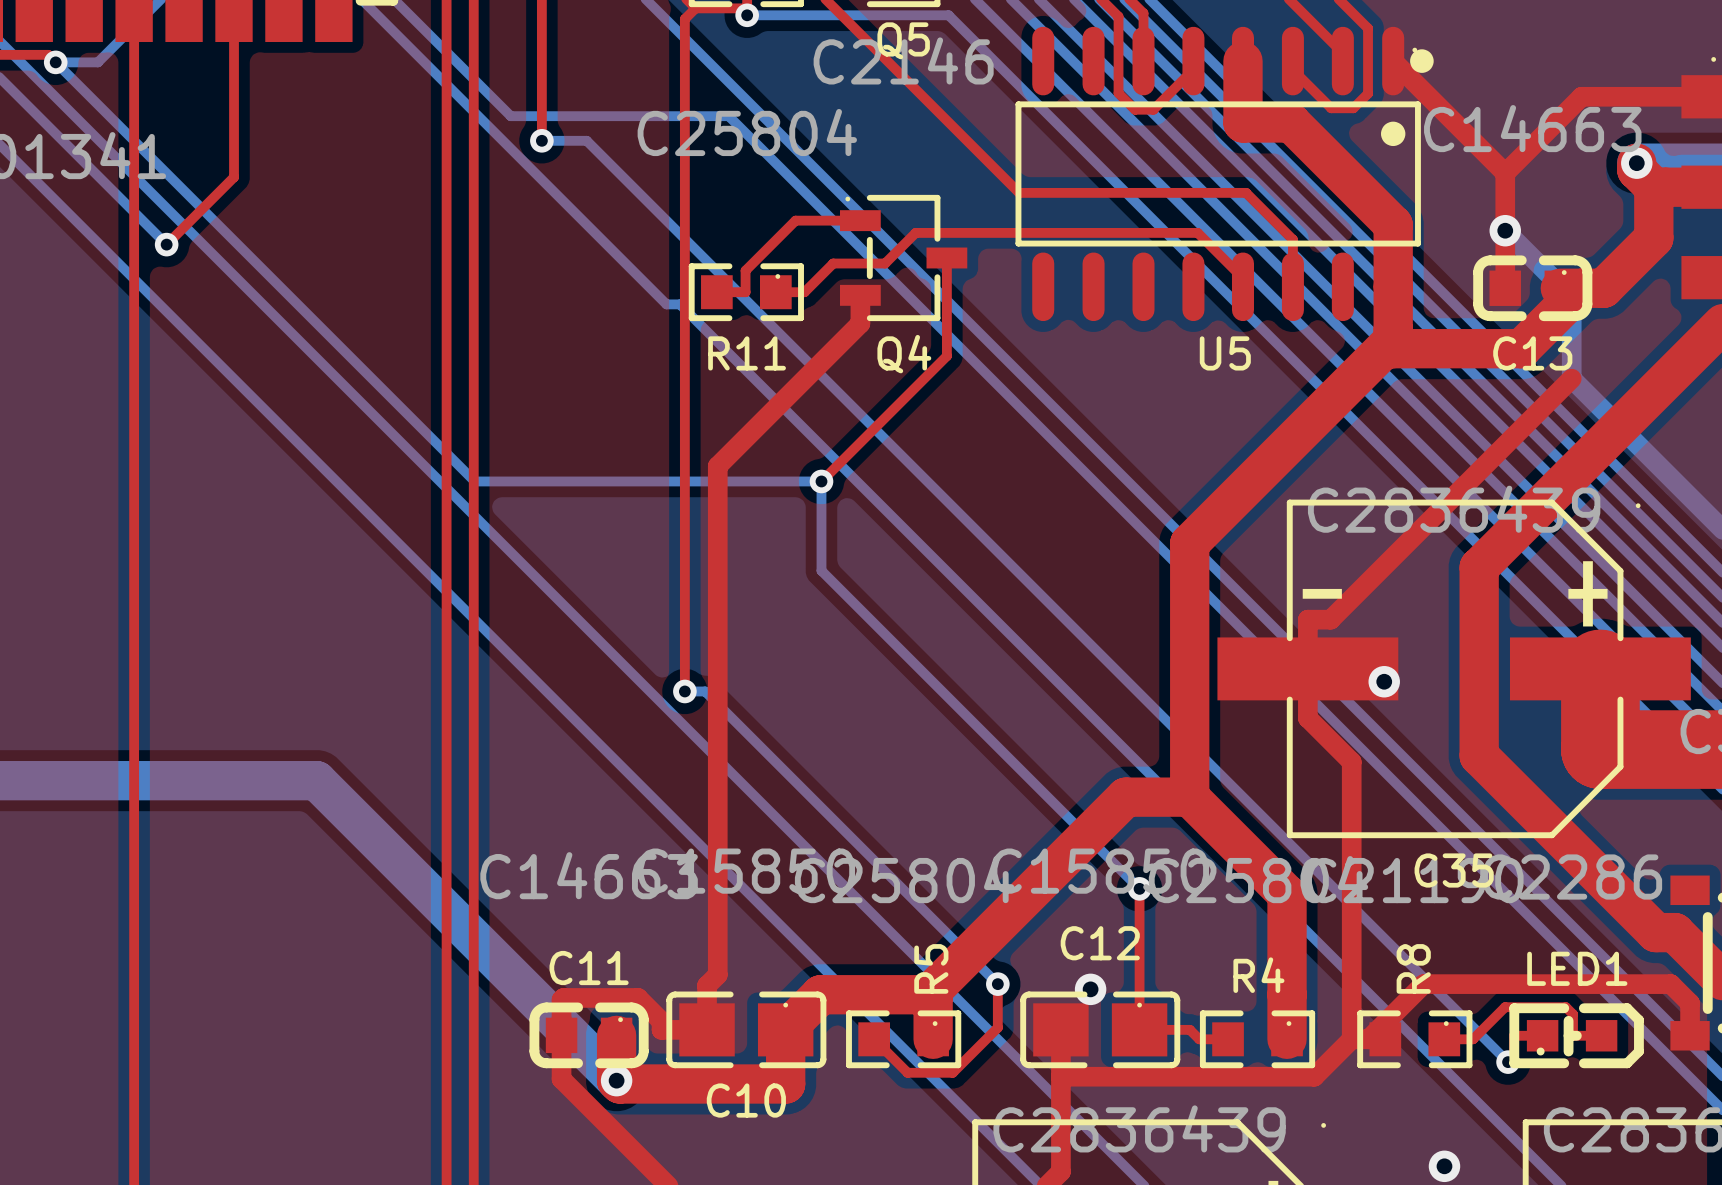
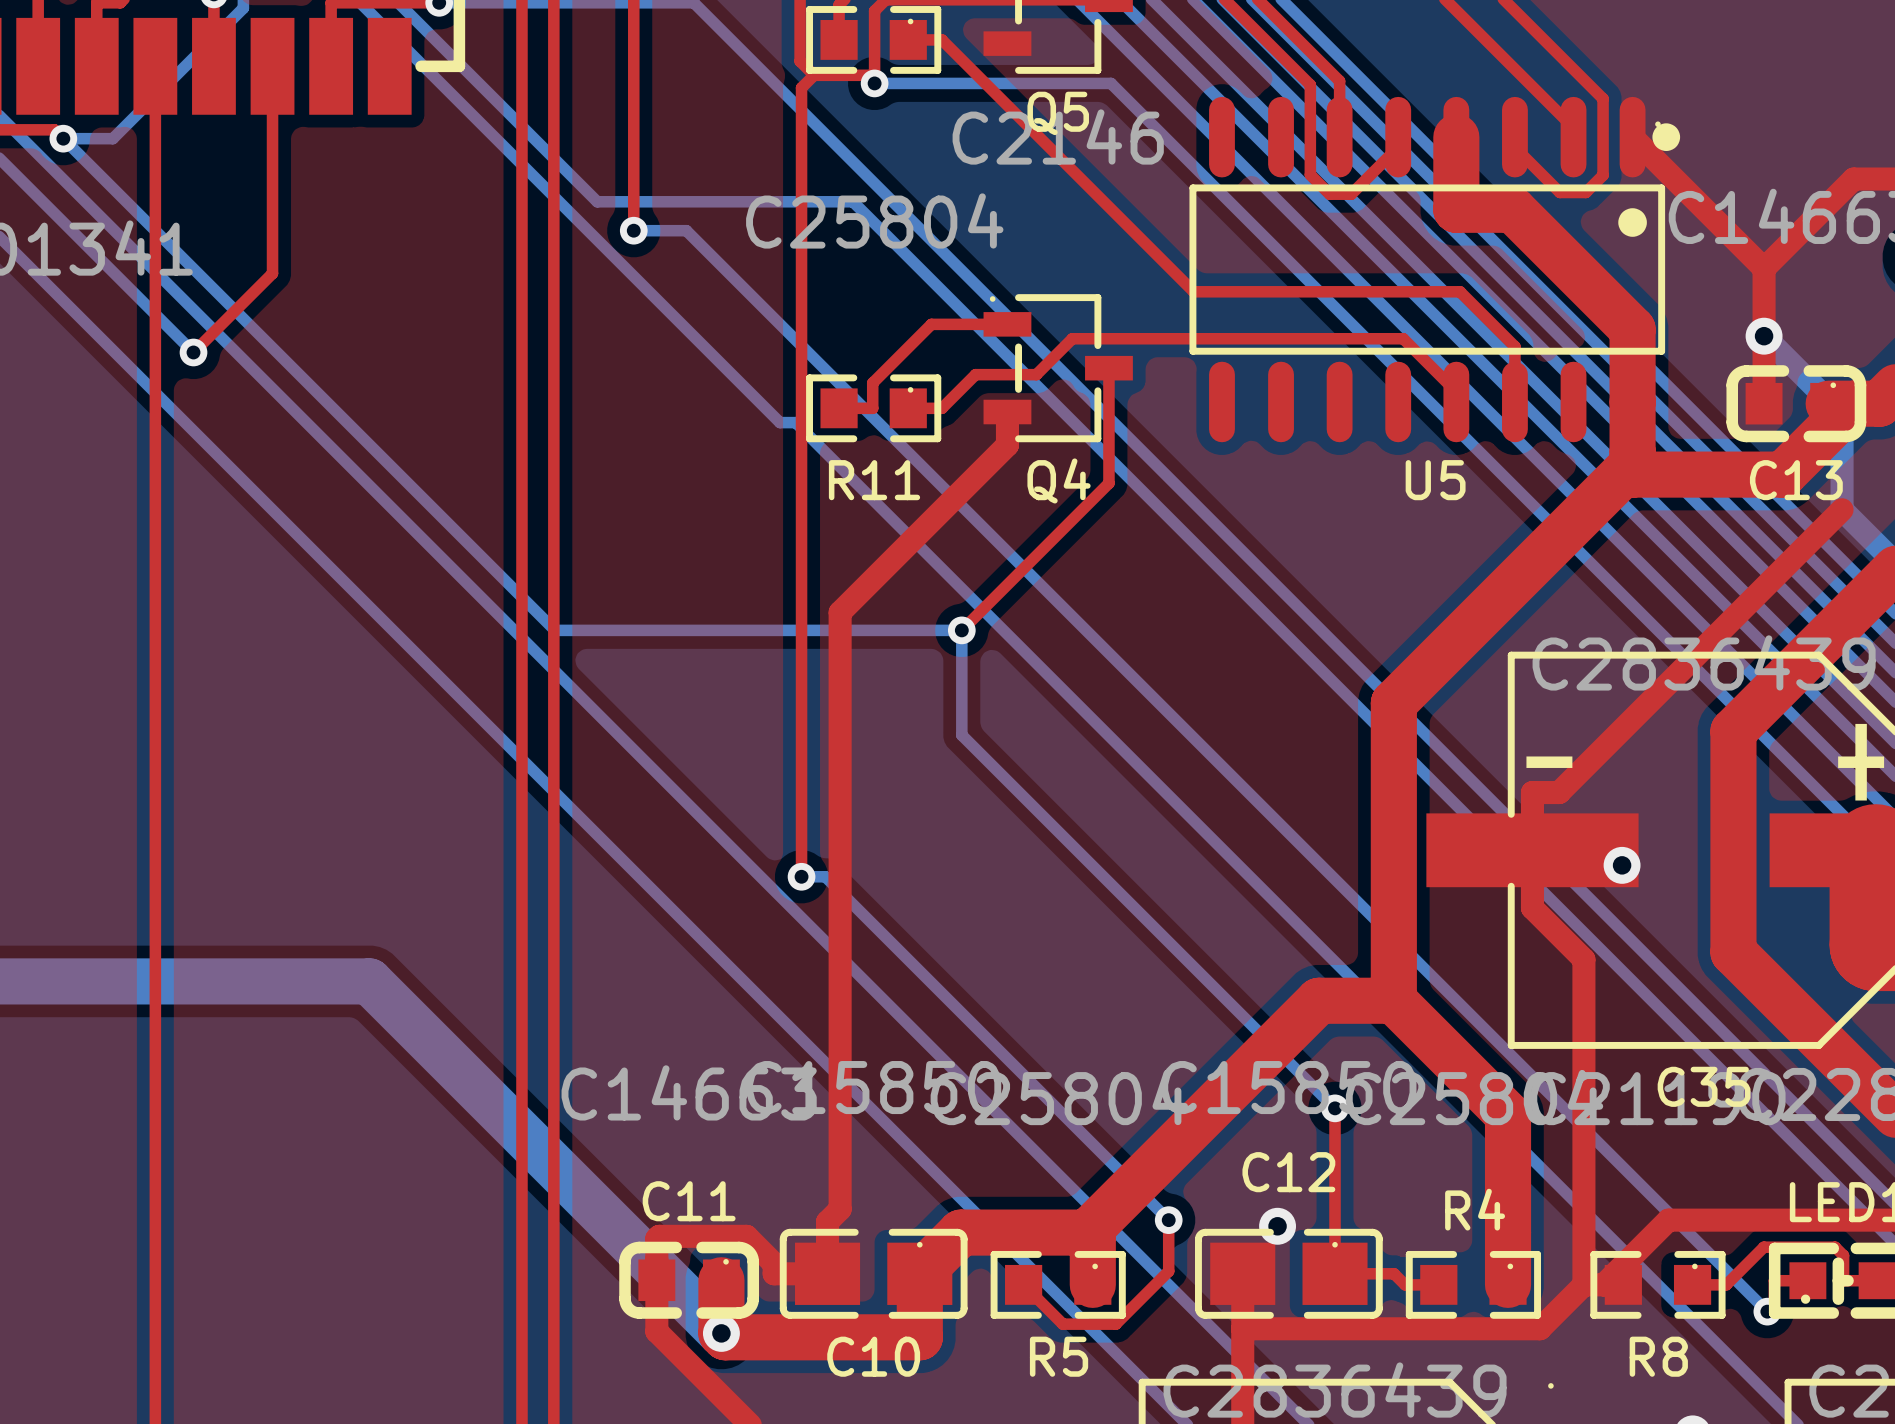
R5 name rotation: 0° (931, 968) -> 90° clockwise (1059, 1356)
R5 name position: R5 (931, 968) -> R5 (1059, 1356)
R8 name rotation: 0° (1413, 968) -> 90° clockwise (1658, 1356)
R8 name position: R8 (1413, 968) -> R8 (1658, 1356)

